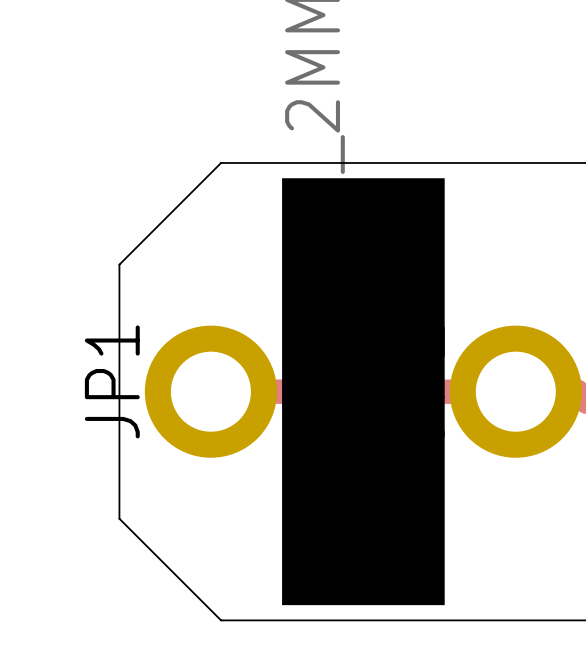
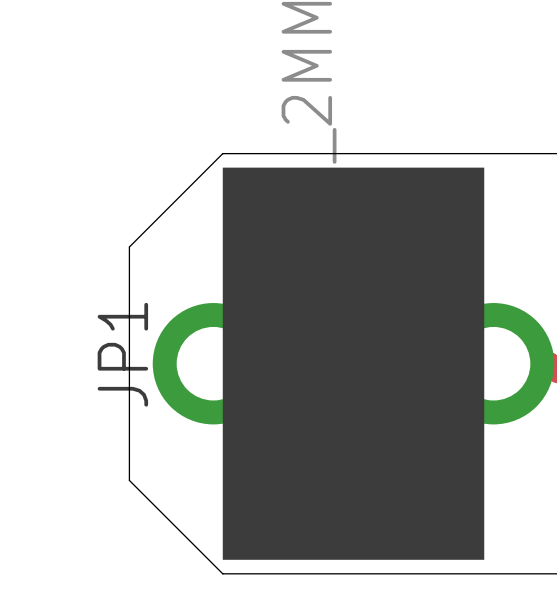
drawing shape: [282, 178, 445, 606] -> [222, 167, 485, 560]

